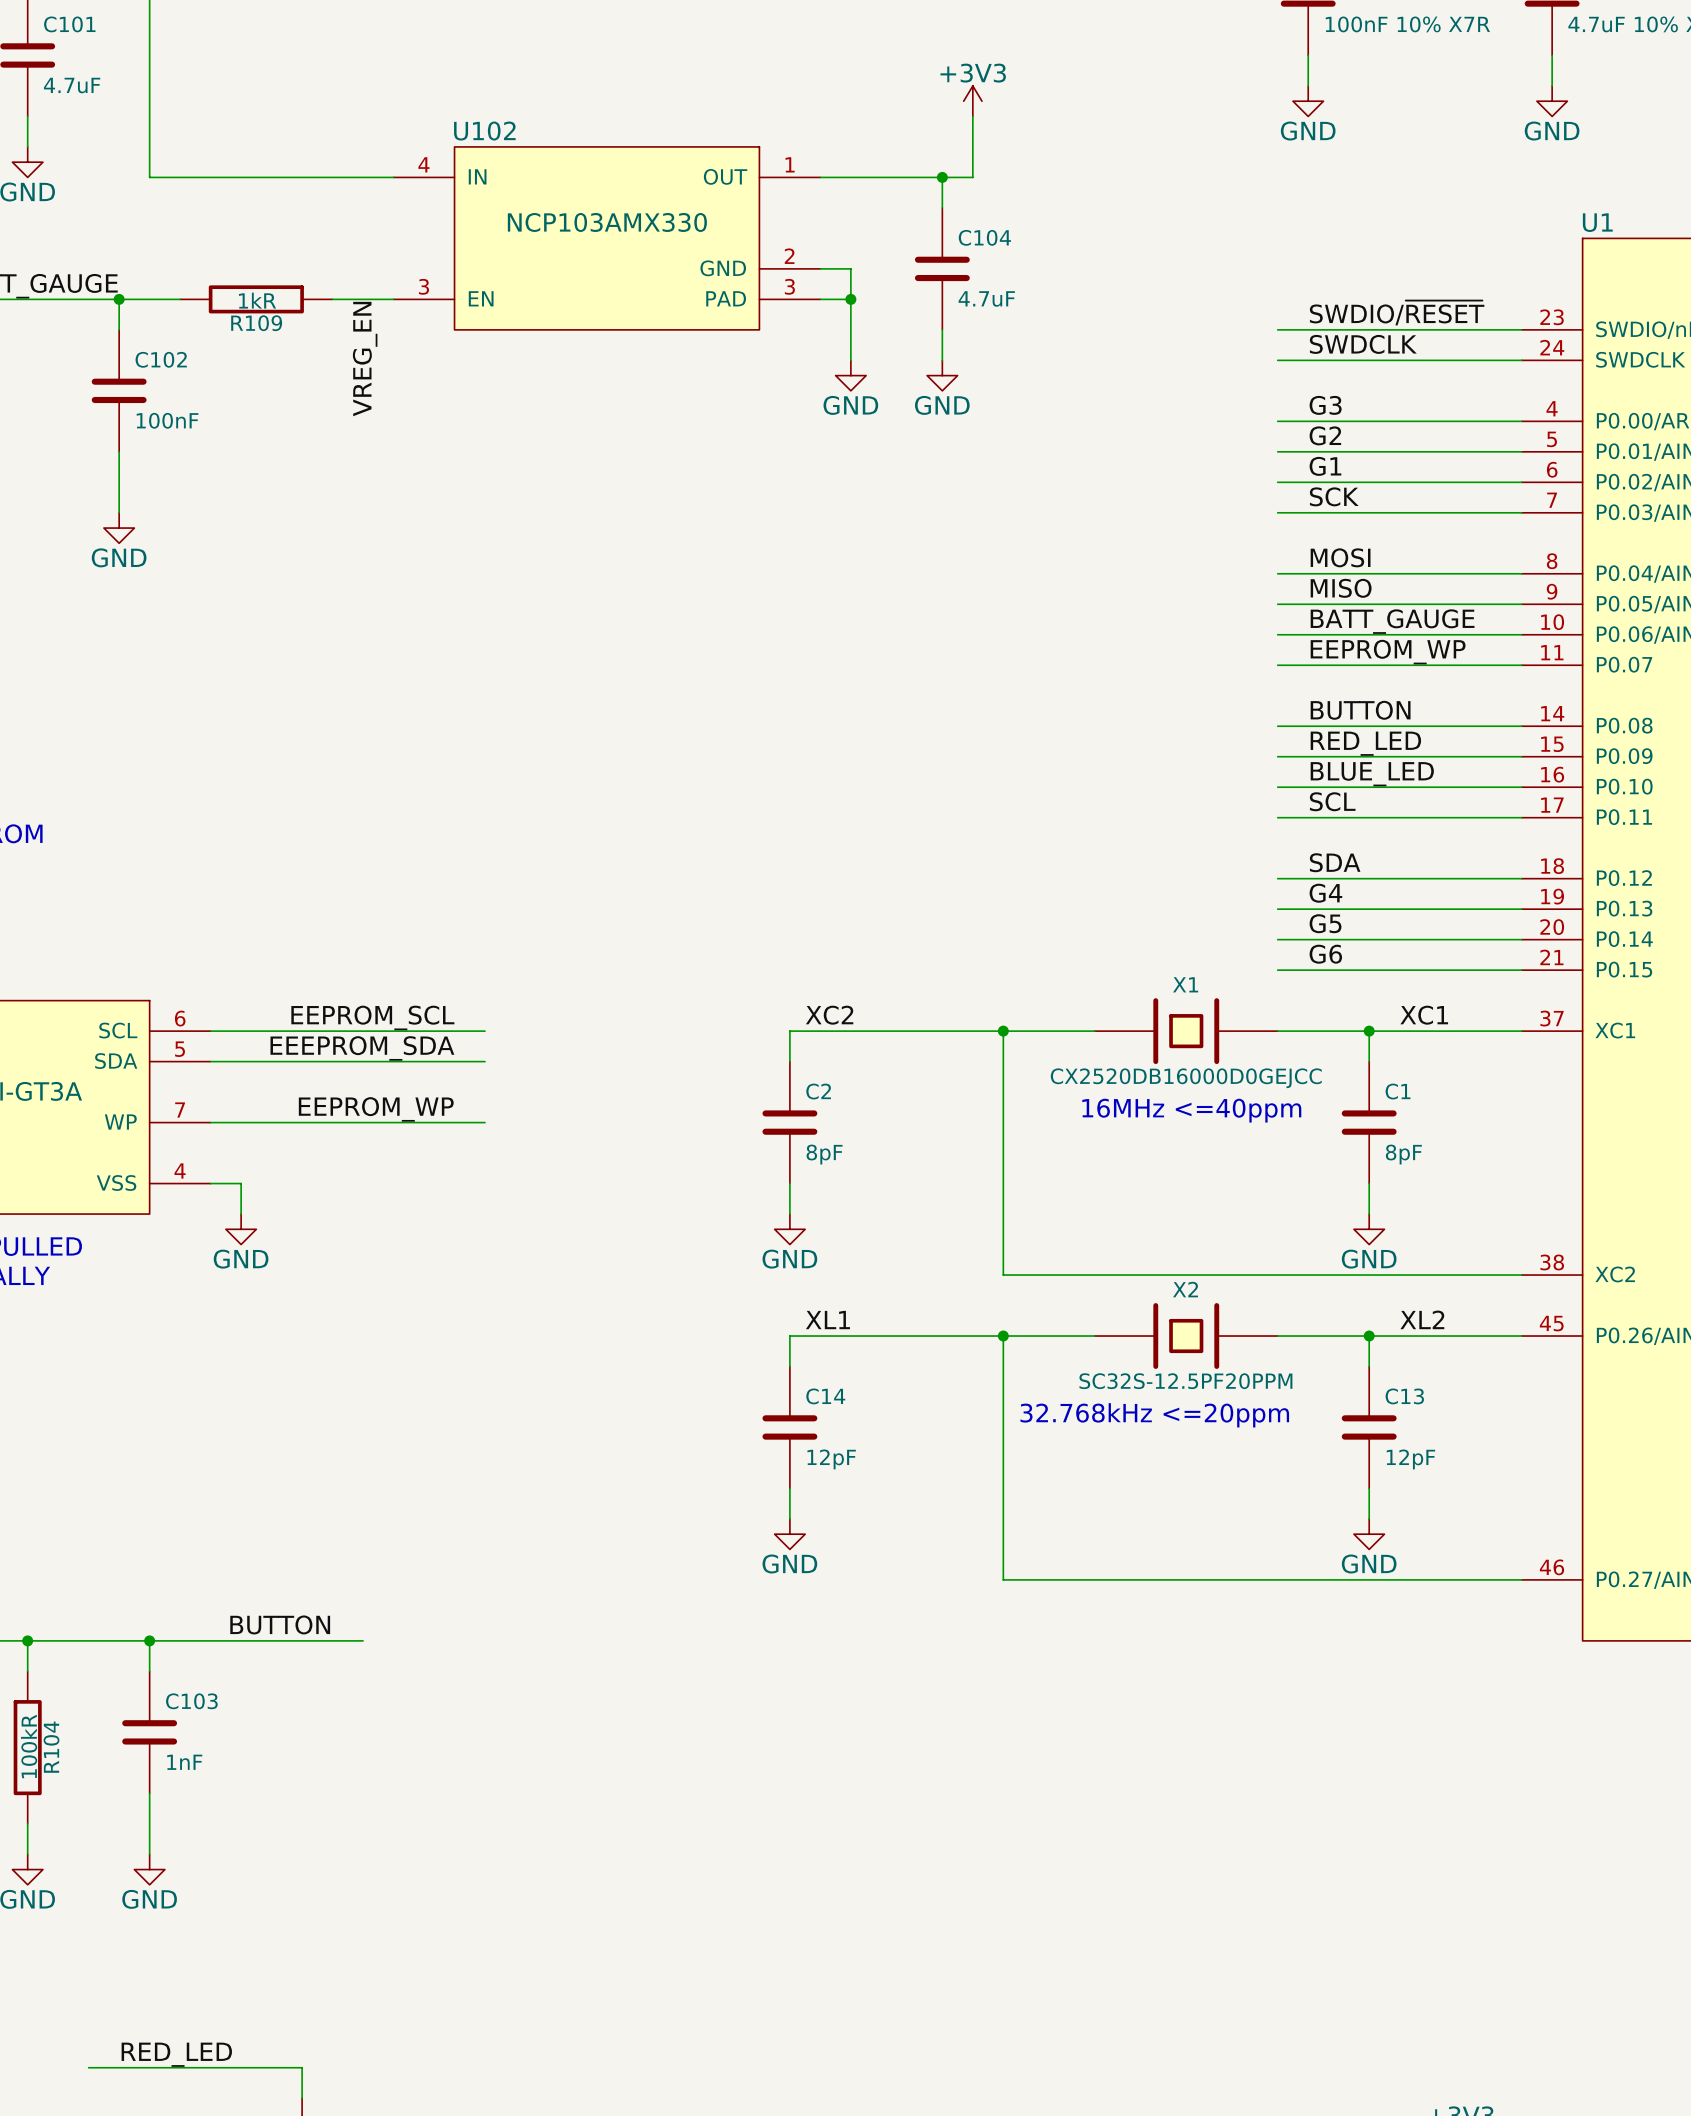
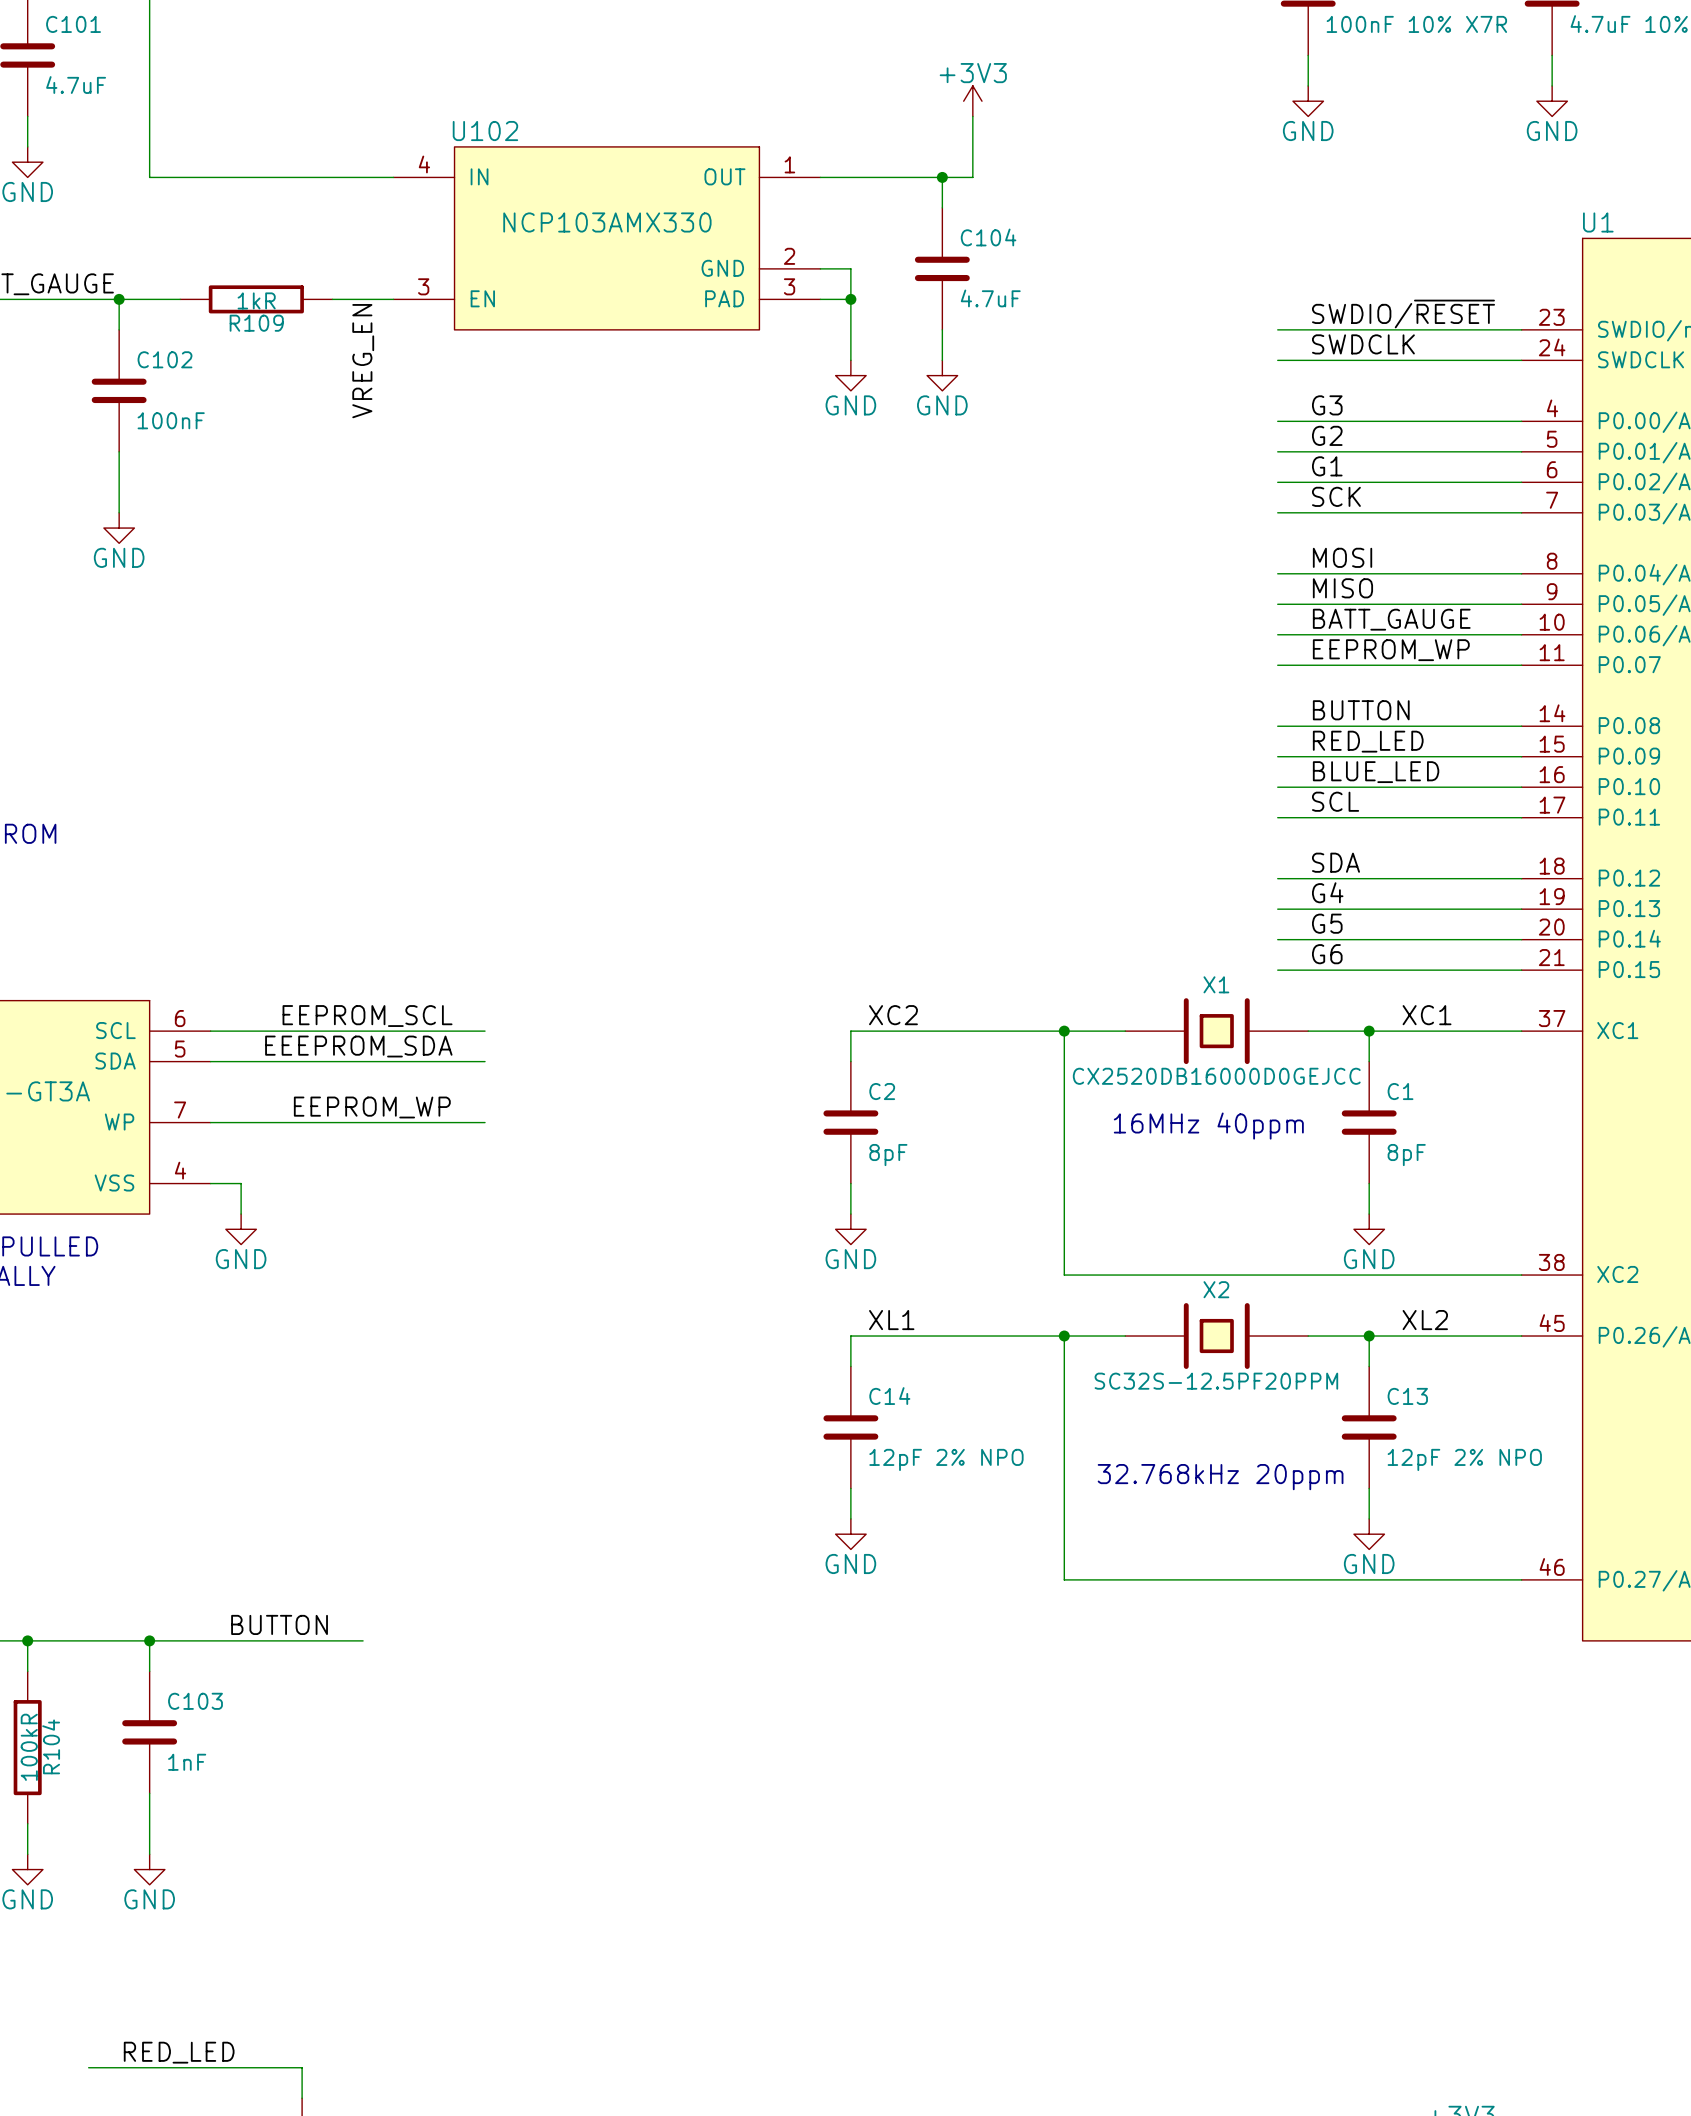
label position: XC2 (829, 1015) -> XC2 (893, 1015)
wire: (850, 1031) (789, 1031) (789, 1061) -> (850, 1031) (850, 1061)
wire: (1003, 1031) (1003, 1275) (1064, 1275) -> (1064, 1031) (1064, 1275)
junction position: (1003, 1031) -> (1064, 1031)
X1 position: (1186, 1031) -> (1216, 1031)
text: 16MHz <=40ppm (1191, 1110) -> 16MHz 40ppm (1208, 1126)
C2 position: (789, 1122) -> (850, 1122)
wire: (789, 1183) (789, 1214) -> (850, 1183) (850, 1214)
power symbol position: GND (789, 1229) -> GND (850, 1229)
label position: XL1 (827, 1320) -> XL1 (891, 1320)
wire: (850, 1336) (789, 1336) (789, 1366) -> (850, 1336) (850, 1366)
wire: (1003, 1336) (1003, 1579) (1064, 1579) -> (1064, 1336) (1064, 1579)
junction position: (1003, 1336) -> (1064, 1336)
X2 position: (1186, 1336) -> (1216, 1336)
text: 32.768kHz <=20ppm (1154, 1415) -> none
C14 position: (789, 1427) -> (850, 1427)
C14 value: 12pF (831, 1459) -> 12pF 2% NPO (946, 1459)
C13 value: 12pF (1410, 1459) -> 12pF 2% NPO (1464, 1459)
text: none -> 32.768kHz 20ppm (1220, 1477)
wire: (789, 1488) (789, 1518) -> (850, 1488) (850, 1518)
power symbol position: GND (789, 1534) -> GND (850, 1534)

